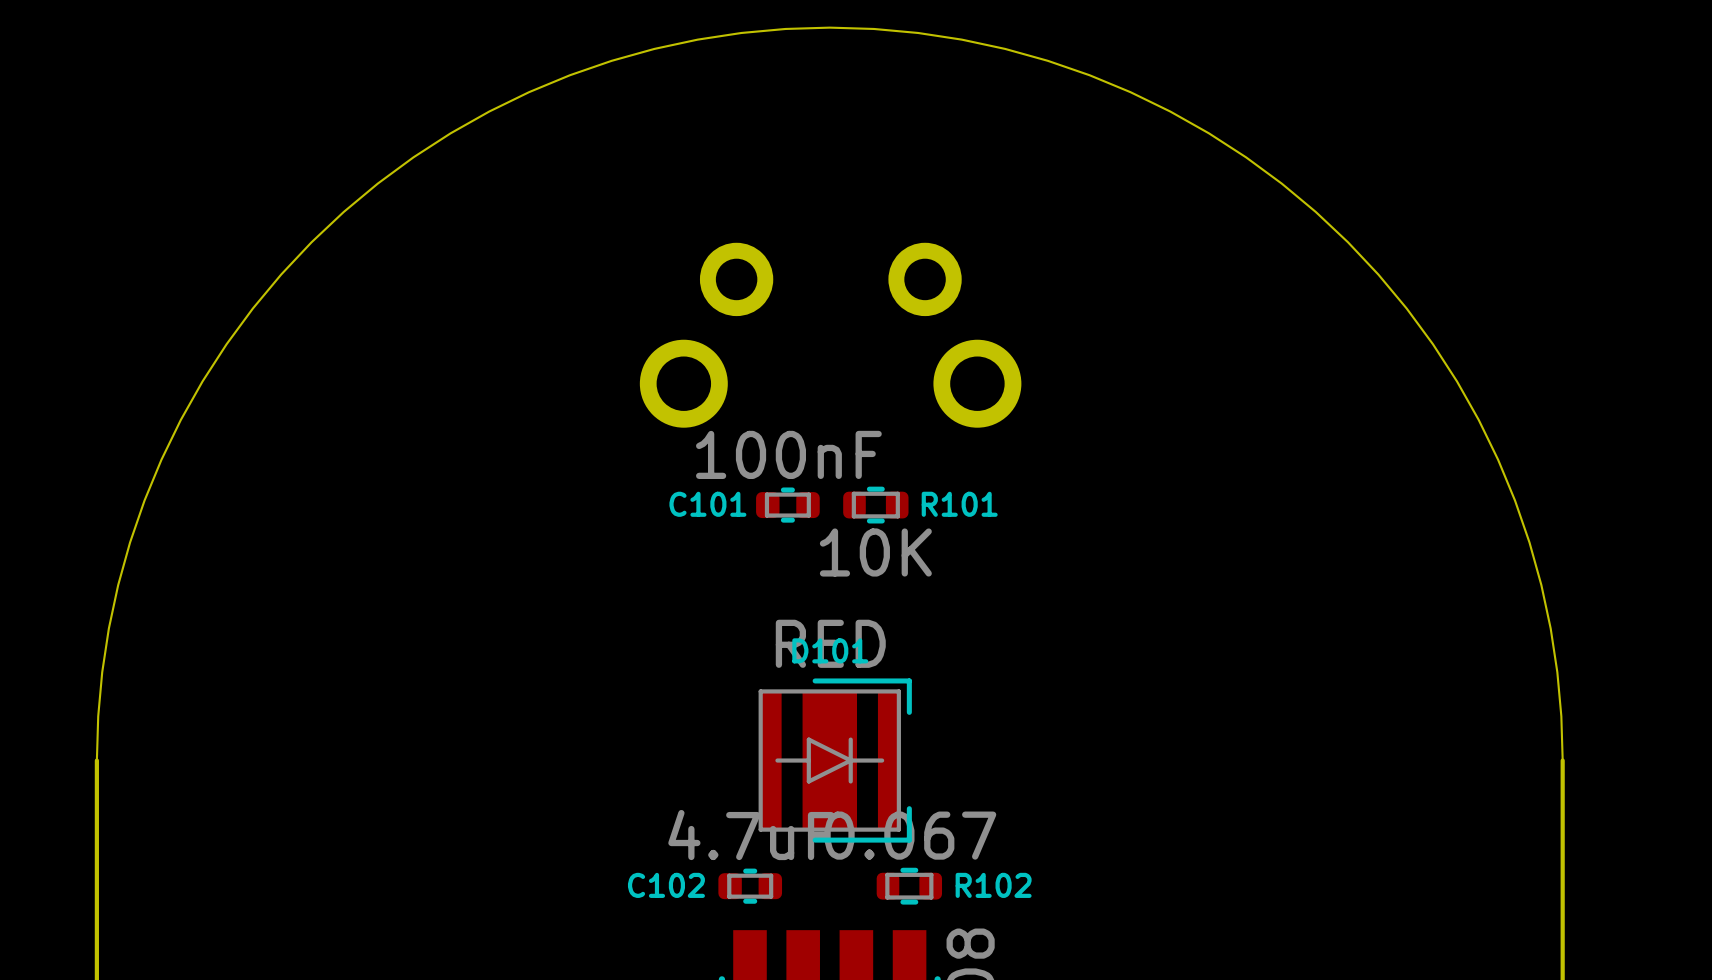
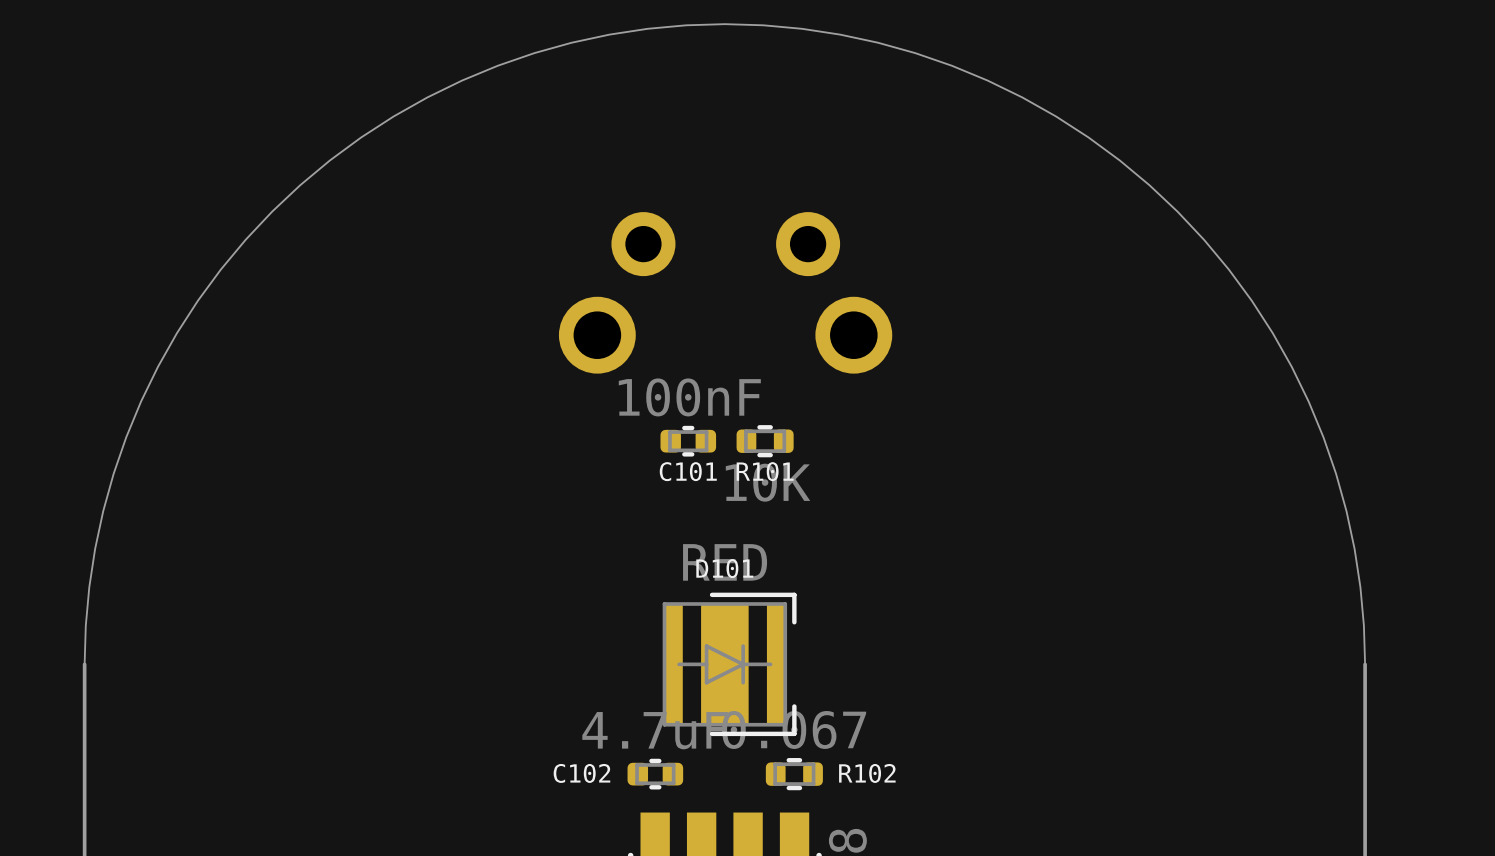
C101 name position: C101 (707, 504) -> C101 (688, 471)
R101 name position: R101 (959, 504) -> R101 (765, 471)

